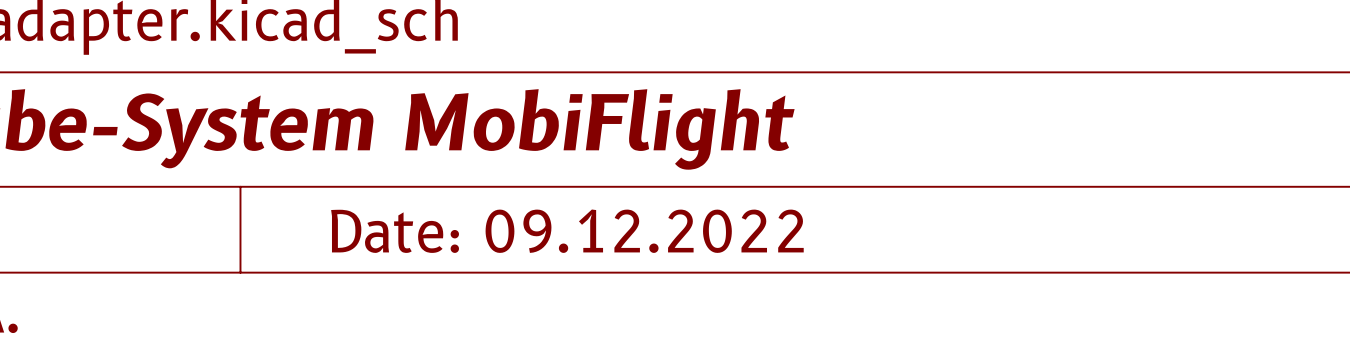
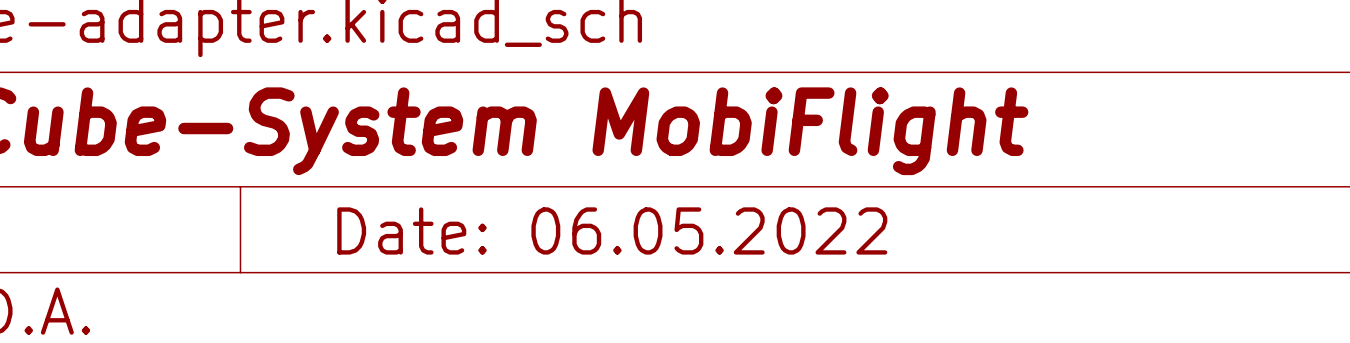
title block: Date: 09.12.2022 (567, 231) -> Date: 06.05.2022 (612, 230)

